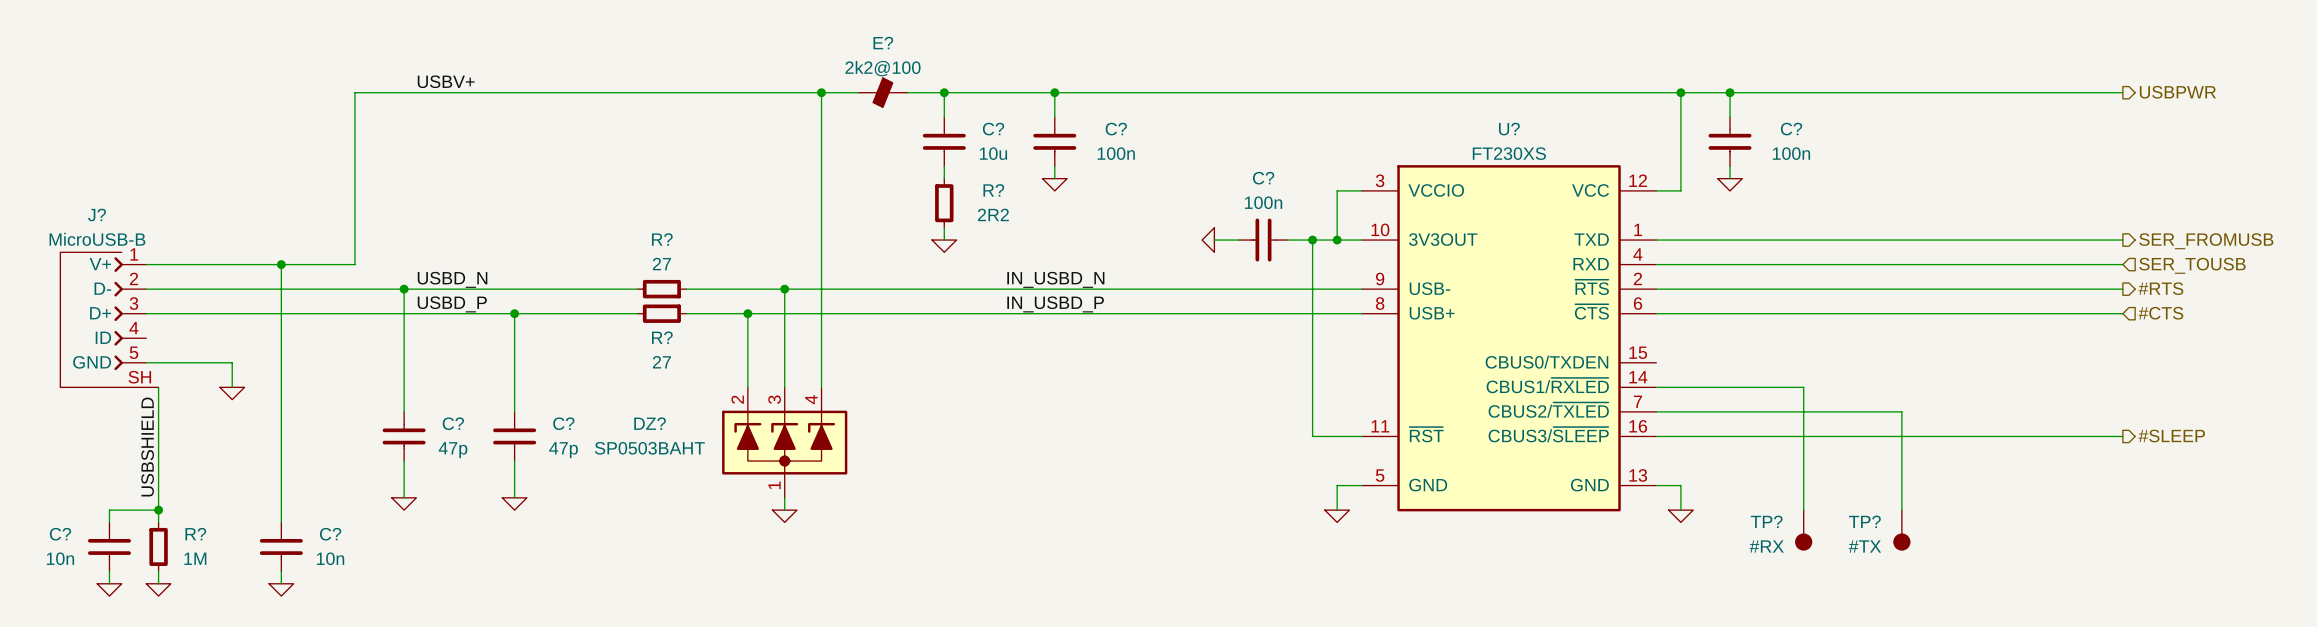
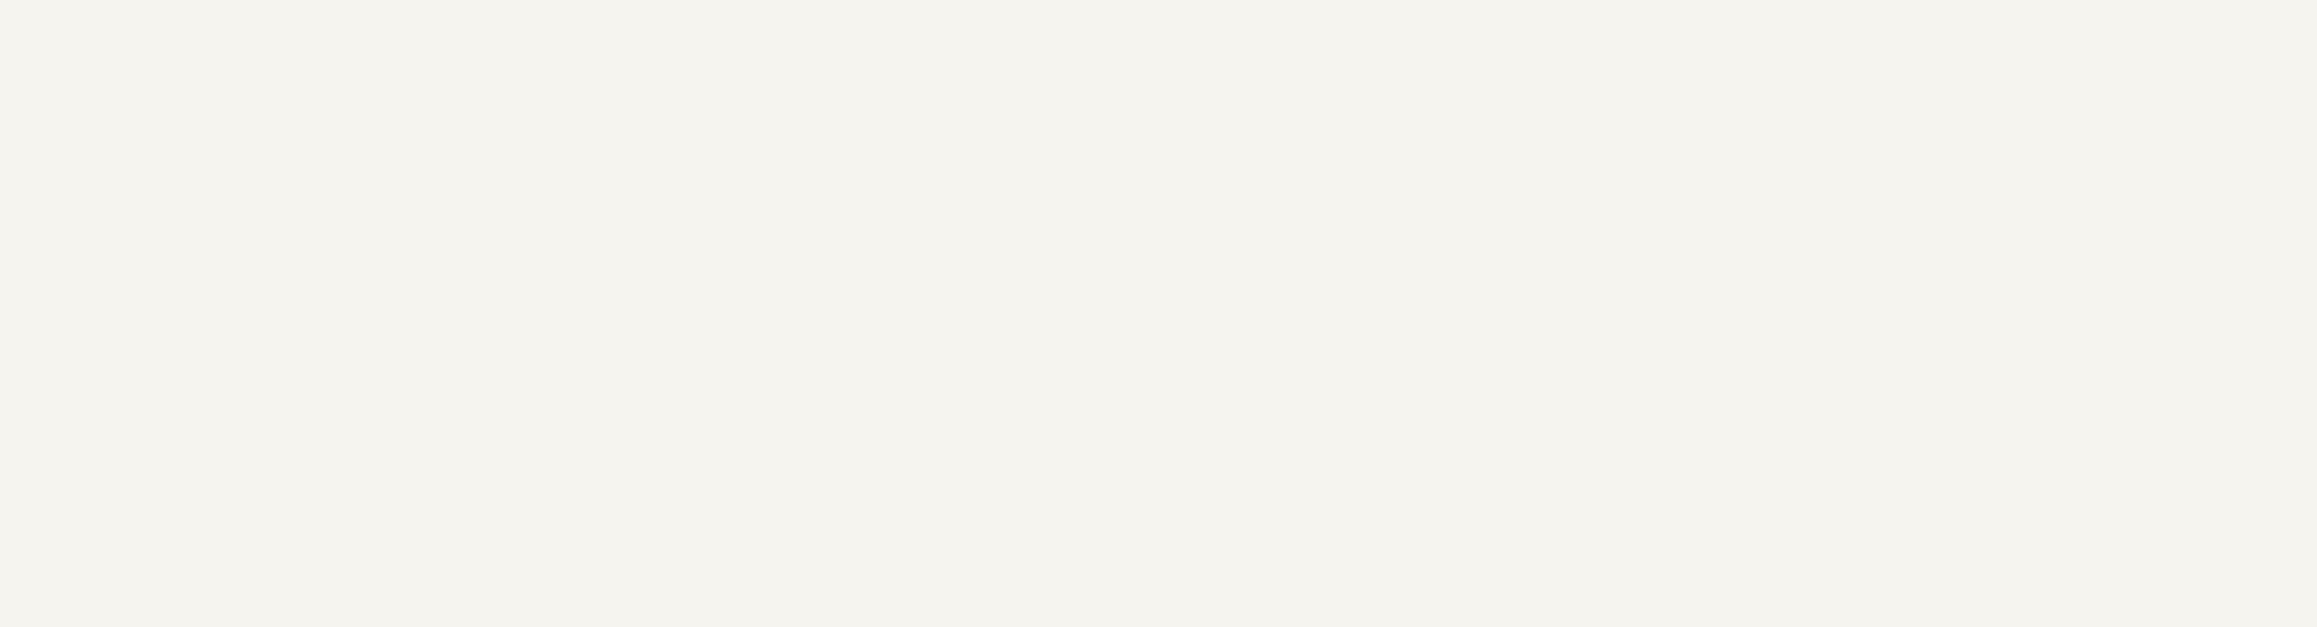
label: USBV+ (446, 81) -> none
wire: (821, 92) (821, 387) -> none
junction: (821, 92) -> none
wire: (858, 92) (355, 92) (355, 264) (146, 264) -> none
E?: 2k2@100 (882, 92) -> none
wire: (907, 92) (2122, 92) -> none
wire: (944, 92) (944, 117) -> none
junction: (944, 92) -> none
wire: (1054, 92) (1054, 117) -> none
junction: (1054, 92) -> none
wire: (1680, 92) (1680, 190) (1656, 190) -> none
junction: (1680, 92) -> none
wire: (1730, 92) (1730, 117) -> none
junction: (1730, 92) -> none
hierarchical label: USBPWR (2177, 92) -> none
C?: 10u (944, 141) -> none
C?: 100n (1054, 141) -> none
C?: 100n (1730, 141) -> none
wire: (944, 166) (944, 178) -> none
wire: (1054, 166) (1054, 178) -> none
wire: (1730, 166) (1730, 178) -> none
power symbol: (1054, 184) -> none
power symbol: (1730, 184) -> none
wire: (1361, 190) (1337, 190) (1337, 240) -> none
R?: 2R2 (944, 203) -> none
wire: (944, 227) (944, 240) -> none
power symbol: (1208, 240) -> none
wire: (1214, 240) (1238, 240) -> none
C?: 100n (1263, 240) -> none
wire: (1288, 240) (1361, 240) -> none
wire: (1312, 240) (1312, 436) (1361, 436) -> none
junction: (1312, 240) -> none
junction: (1337, 240) -> none
wire: (1656, 240) (2122, 240) -> none
hierarchical label: SER_FROMUSB (2206, 241) -> none
power symbol: (944, 246) -> none
wire: (281, 264) (281, 522) -> none
junction: (281, 264) -> none
wire: (1656, 264) (2122, 264) -> none
hierarchical label: SER_TOUSB (2192, 265) -> none
label: USBD_N (452, 279) -> none
label: IN_USBD_N (1055, 279) -> none
hierarchical label: #RTS (2160, 288) -> none
wire: (146, 289) (637, 289) -> none
wire: (404, 289) (404, 411) -> none
junction: (404, 289) -> none
R?: 27 (661, 289) -> none
wire: (686, 289) (1361, 289) -> none
wire: (784, 289) (784, 387) -> none
junction: (784, 289) -> none
wire: (1656, 289) (2122, 289) -> none
label: USBD_P (452, 304) -> none
label: IN_USBD_P (1055, 304) -> none
wire: (146, 313) (637, 313) -> none
wire: (514, 313) (514, 411) -> none
junction: (514, 313) -> none
R?: 27 (661, 313) -> none
wire: (686, 313) (1361, 313) -> none
wire: (747, 313) (747, 387) -> none
junction: (747, 313) -> none
wire: (1656, 313) (2122, 313) -> none
hierarchical label: #CTS (2160, 313) -> none
J?: MicroUSB-B (109, 319) -> none
U?: FT230XS (1509, 338) -> none
wire: (146, 362) (232, 362) (232, 387) -> none
wire: (158, 387) (158, 522) -> none
wire: (1656, 387) (1803, 387) (1803, 510) -> none
power symbol: (232, 393) -> none
wire: (1656, 411) (1901, 411) (1901, 510) -> none
C?: 47p (404, 436) -> none
C?: 47p (514, 436) -> none
wire: (1656, 436) (2122, 436) -> none
hierarchical label: #SLEEP (2171, 436) -> none
DZ?: SP0503BAHT (784, 442) -> none
label: USBSHIELD (147, 447) -> none
wire: (404, 461) (404, 497) -> none
wire: (514, 461) (514, 497) -> none
wire: (1361, 485) (1337, 485) (1337, 510) -> none
wire: (1656, 485) (1680, 485) (1680, 510) -> none
wire: (784, 497) (784, 510) -> none
power symbol: (404, 503) -> none
power symbol: (514, 503) -> none
wire: (158, 510) (109, 510) (109, 522) -> none
junction: (158, 510) -> none
power symbol: (784, 516) -> none
power symbol: (1337, 516) -> none
power symbol: (1680, 516) -> none
TP?: #RX (1803, 530) -> none
TP?: #TX (1901, 530) -> none
C?: 10n (109, 546) -> none
R?: 1M (158, 546) -> none
C?: 10n (281, 546) -> none
wire: (109, 571) (109, 583) -> none
wire: (158, 571) (158, 583) -> none
wire: (281, 571) (281, 583) -> none
power symbol: (109, 589) -> none
power symbol: (158, 589) -> none
power symbol: (281, 589) -> none

